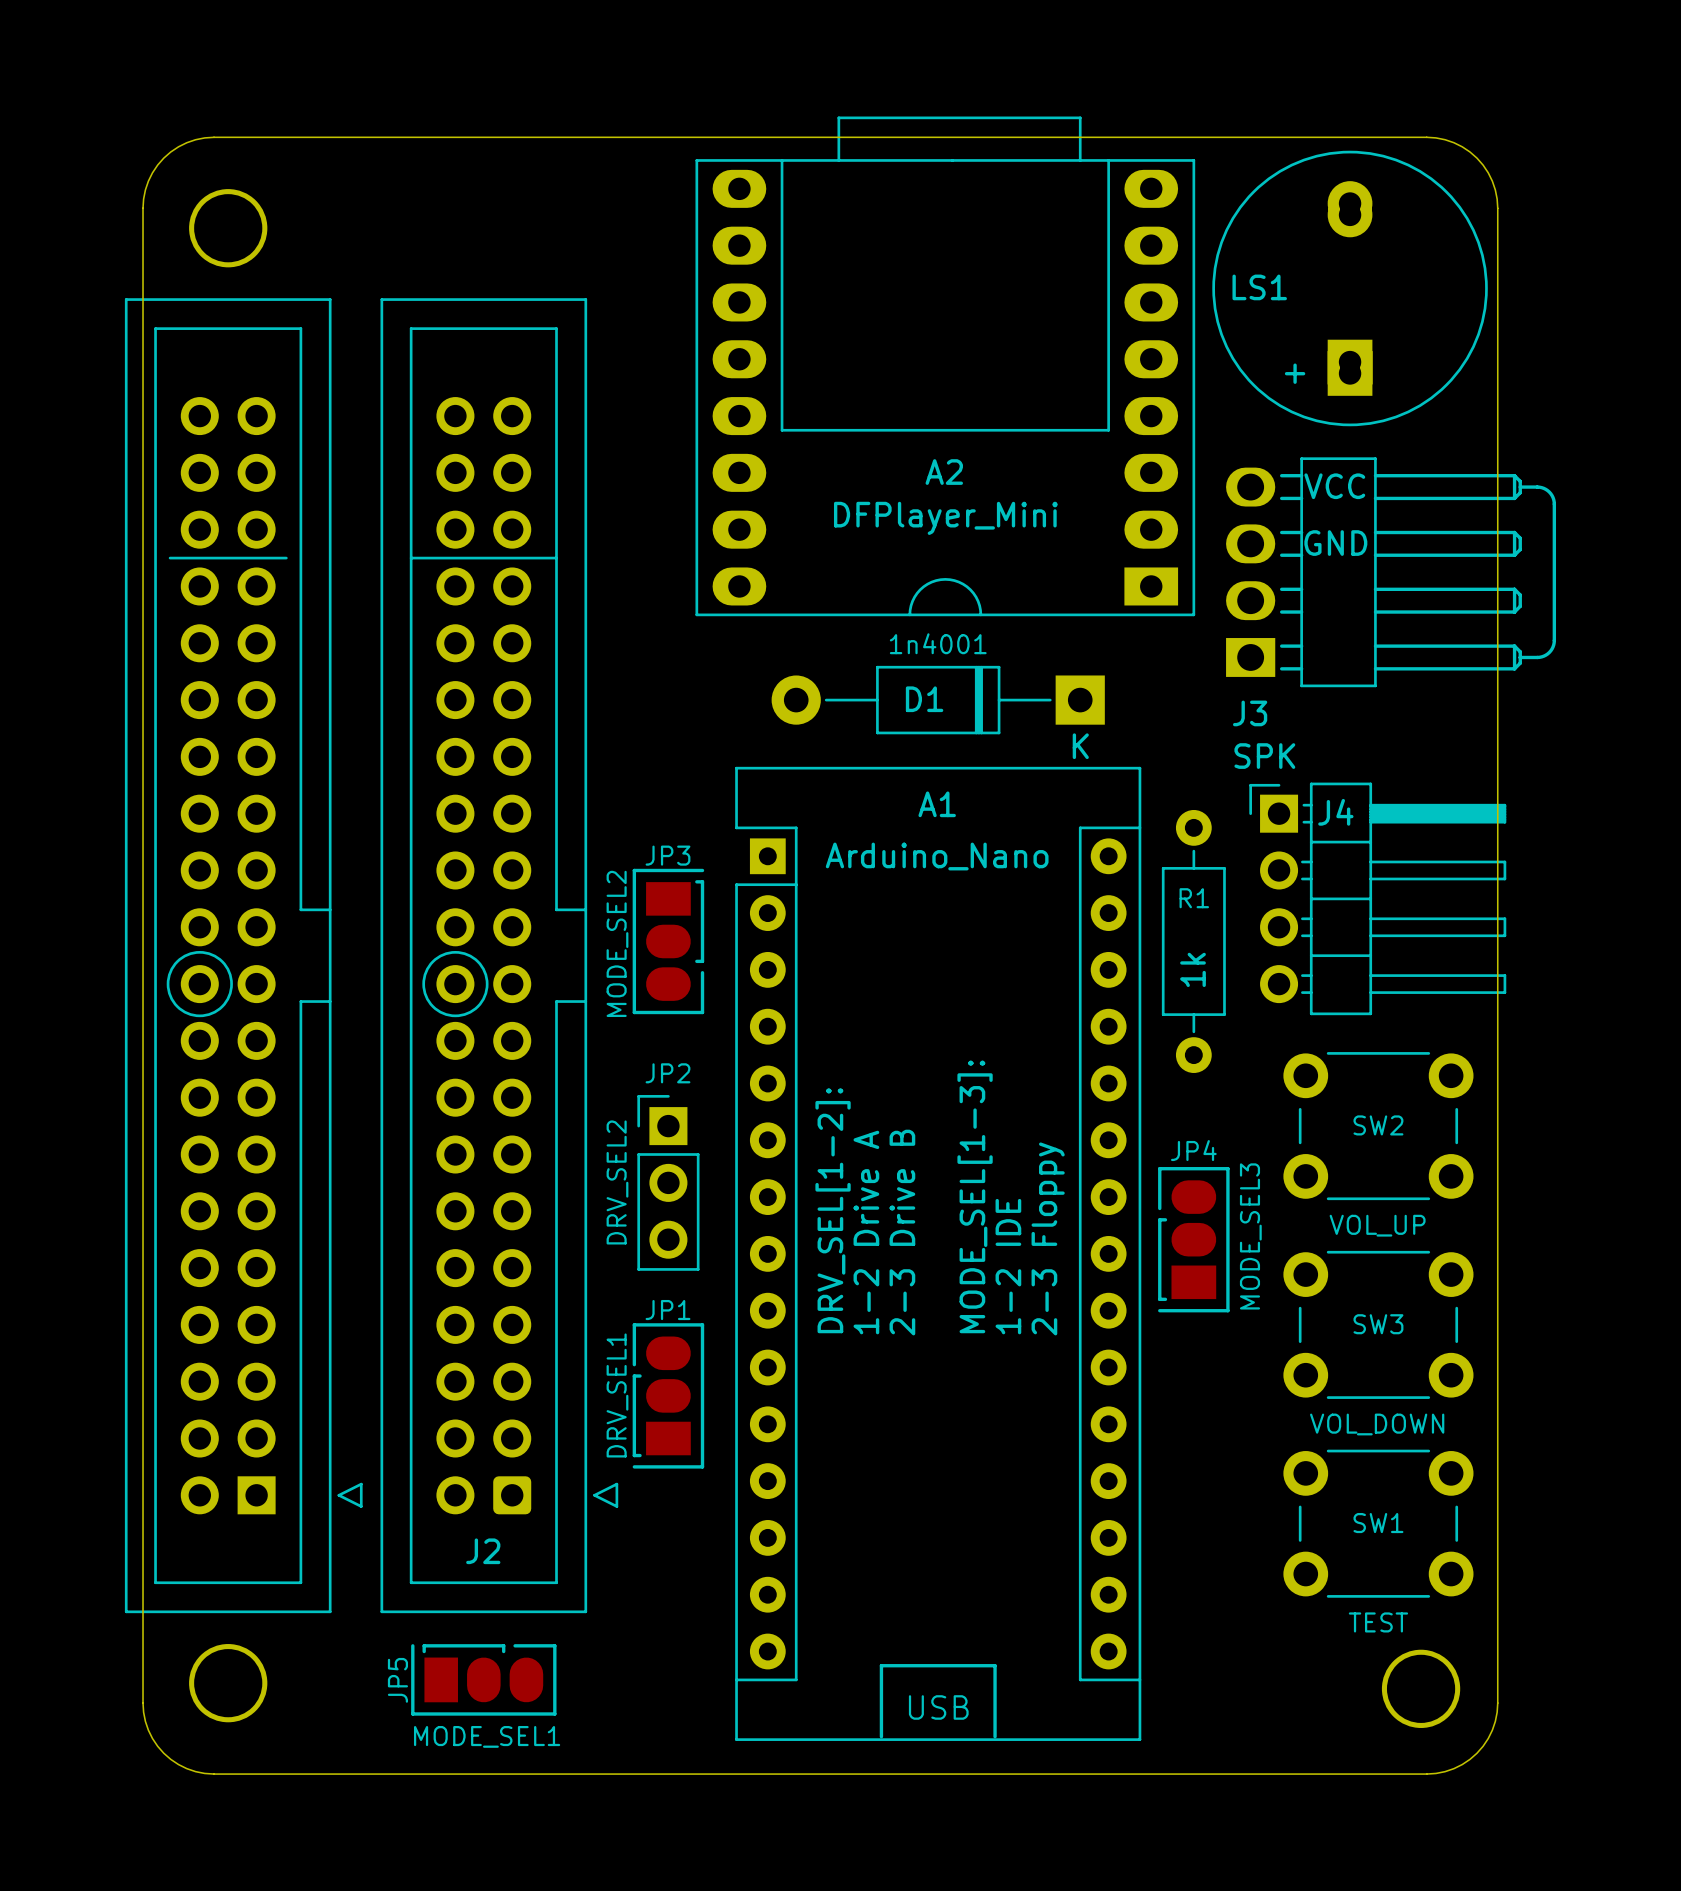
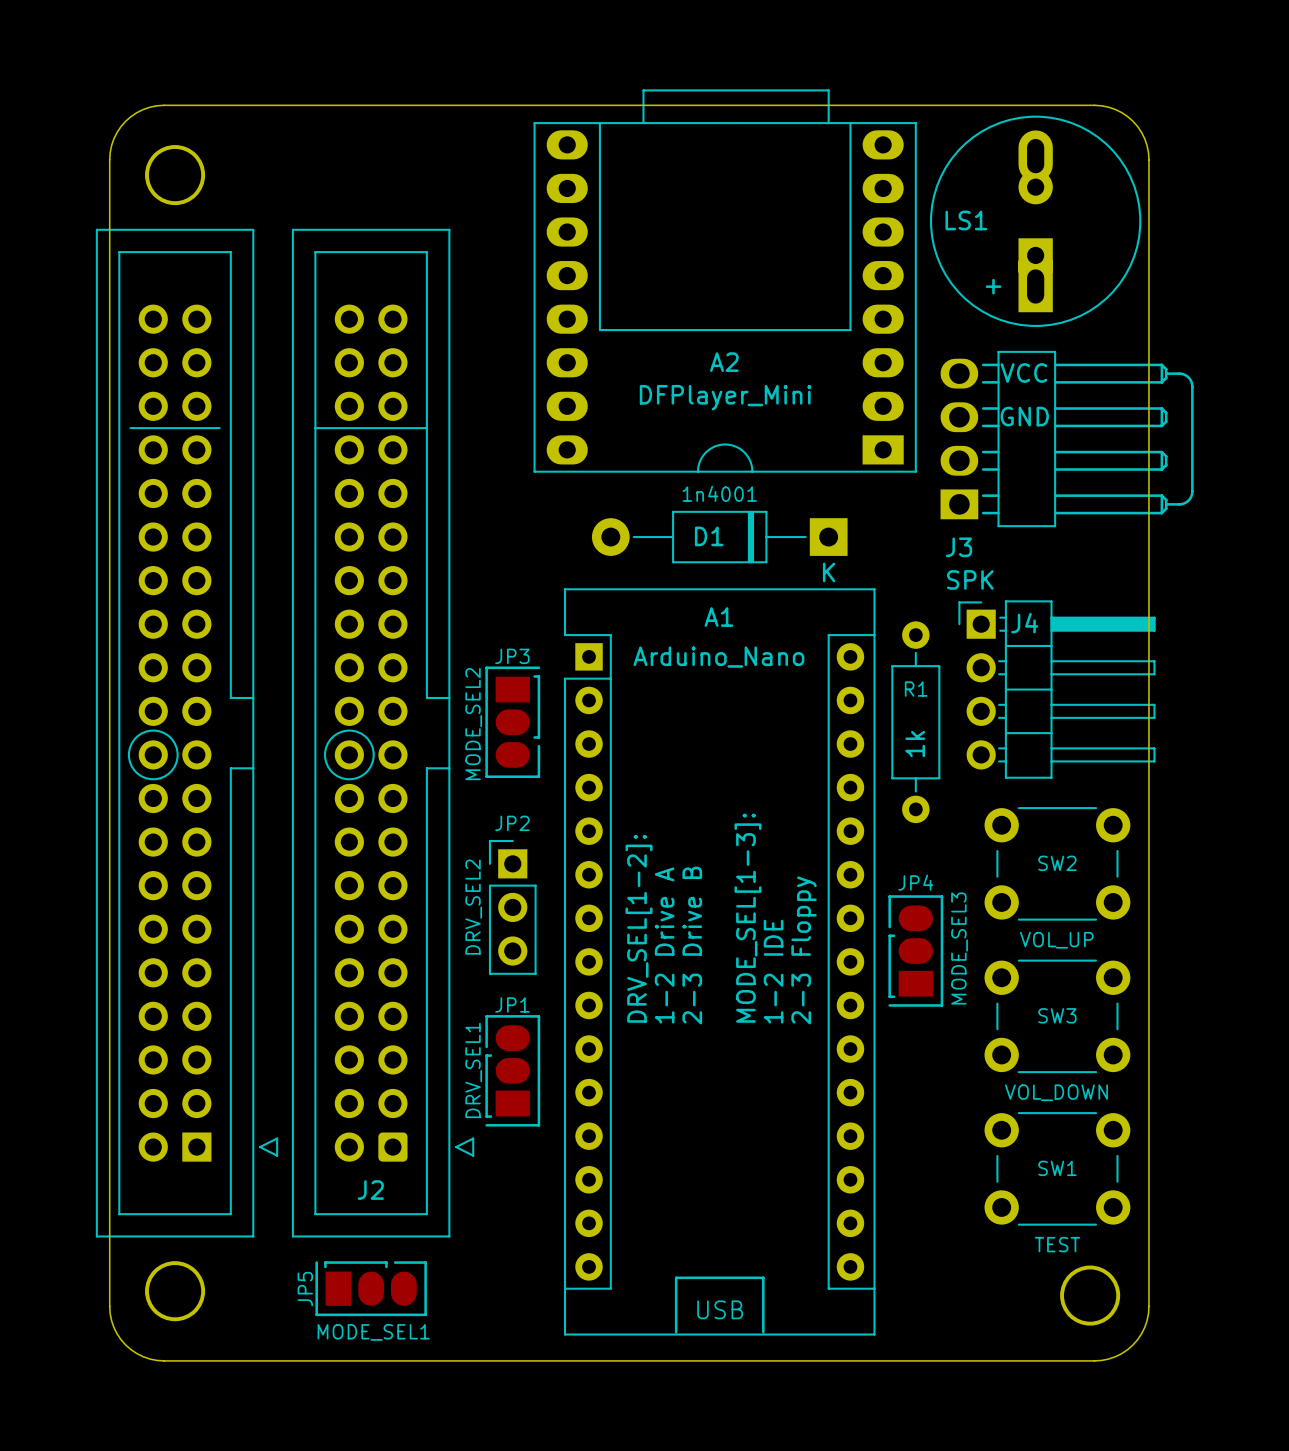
LS1 footprint: [1212, 150, 1488, 427] -> [929, 115, 1142, 327]

